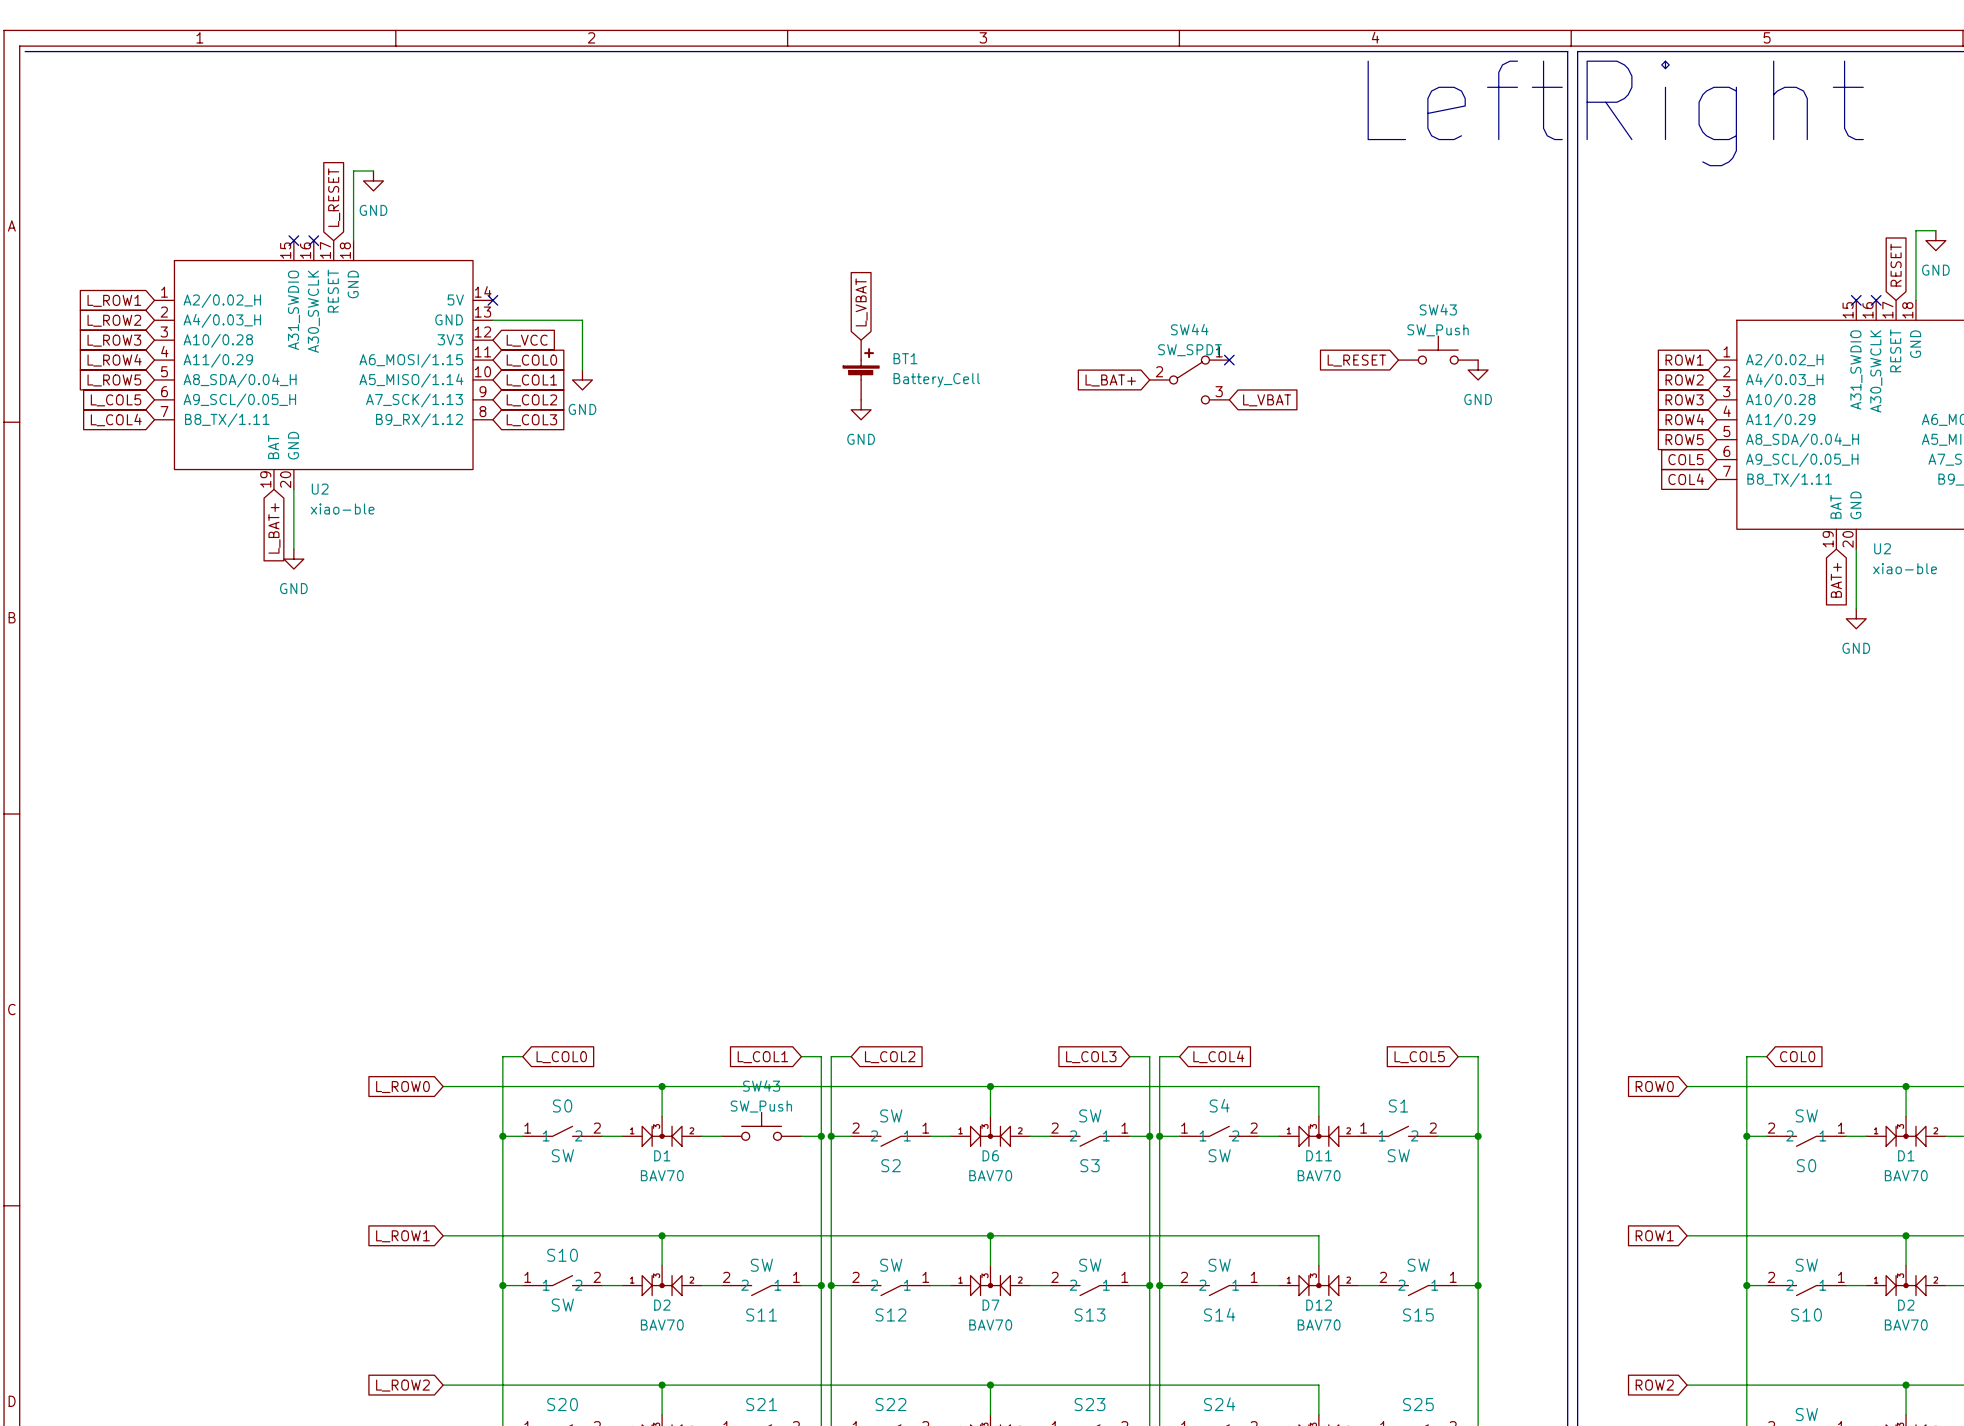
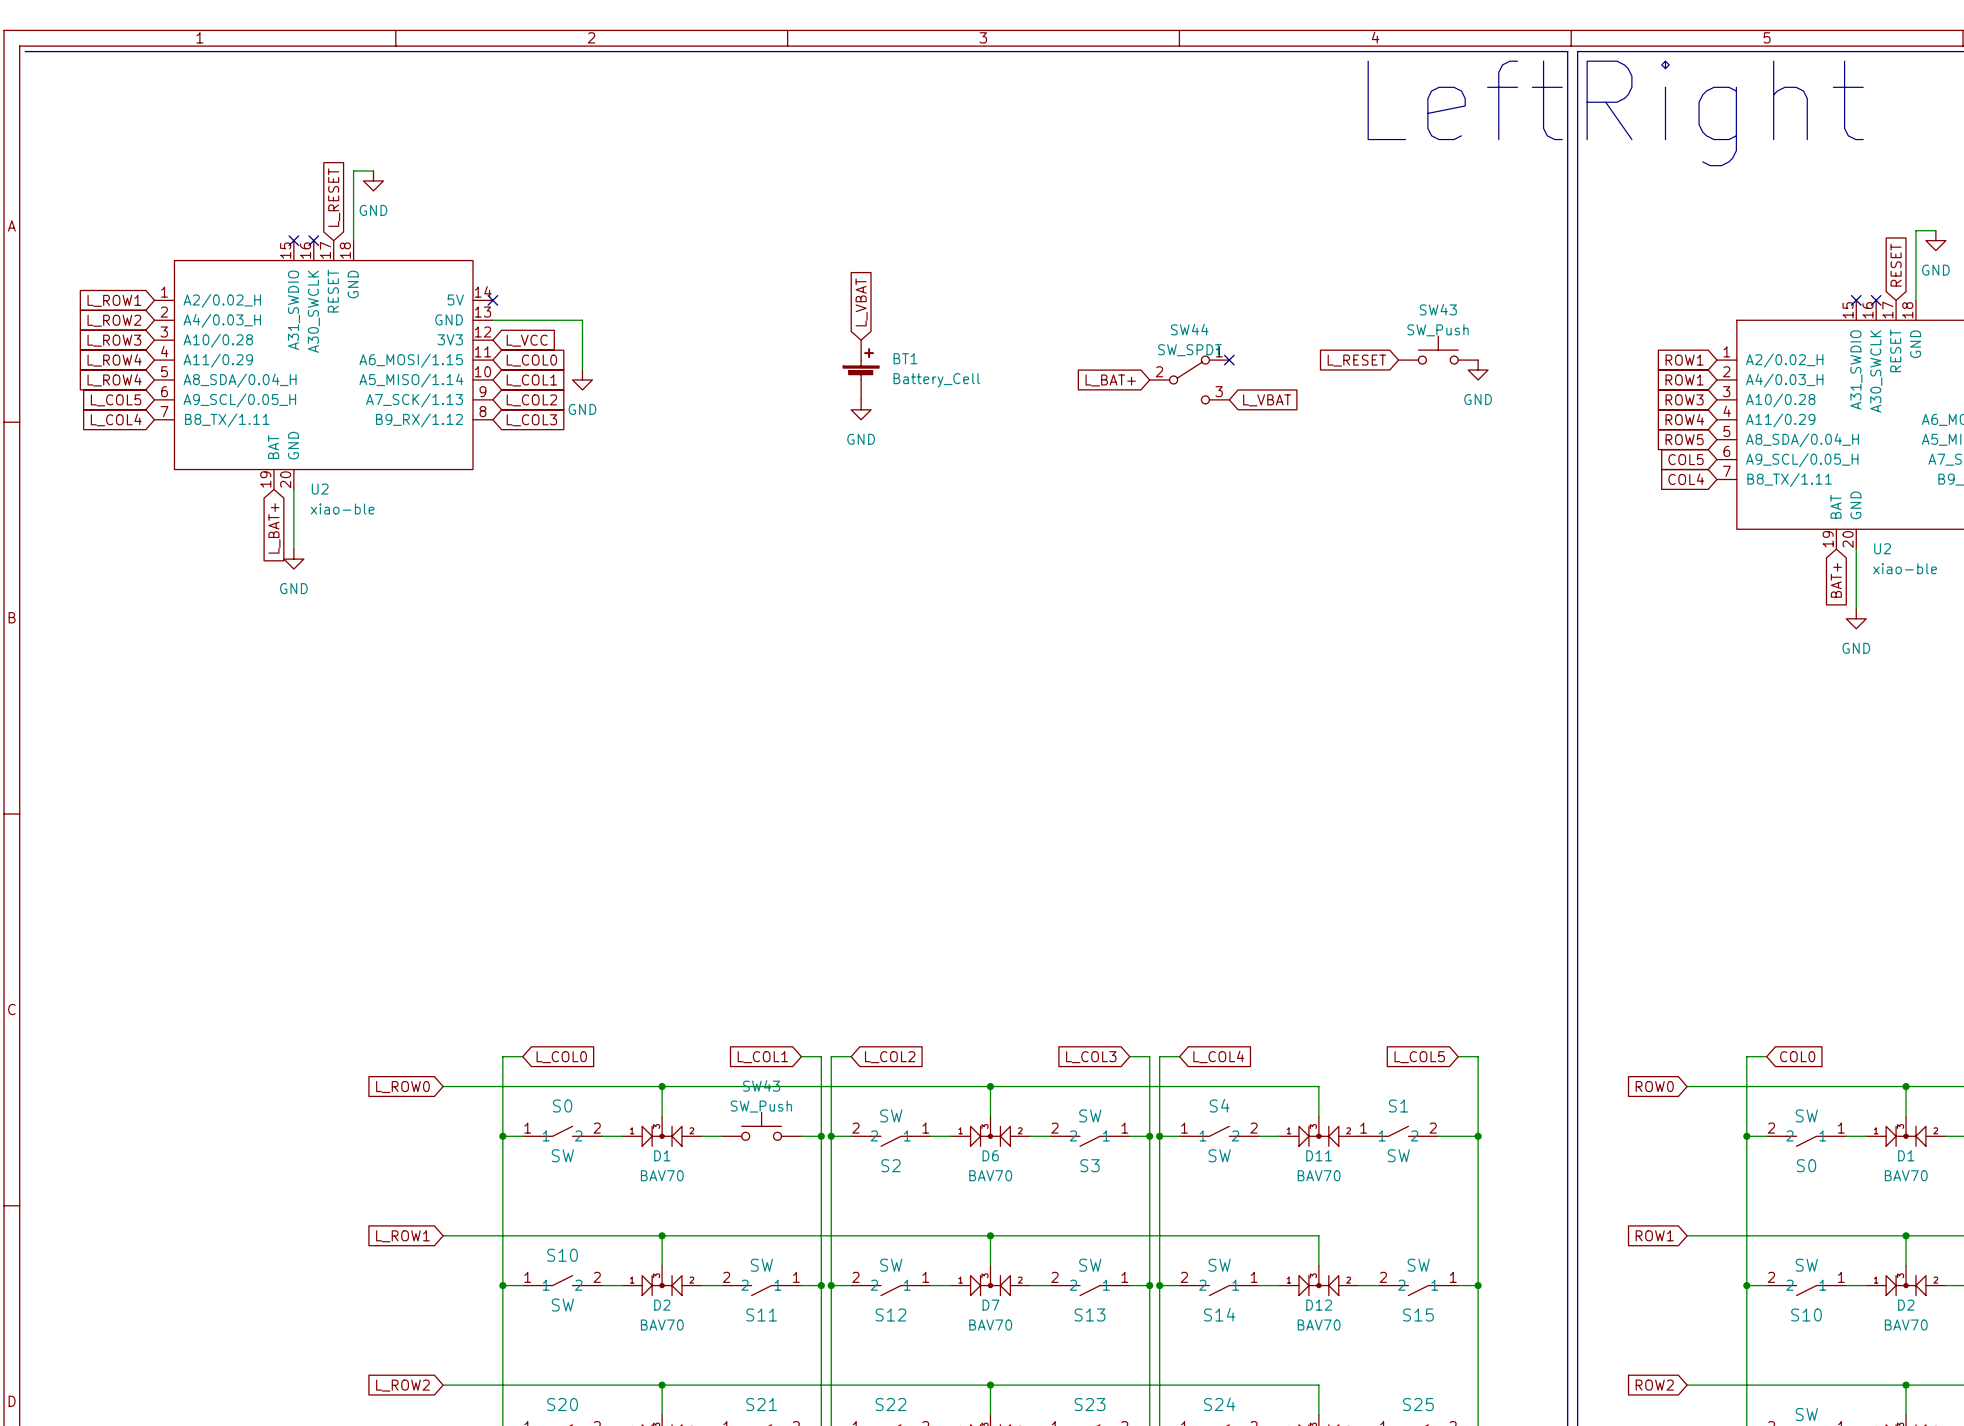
global label: ROW2 (1684, 379) -> ROW1 (1684, 379)
global label: L_ROW5 (114, 380) -> L_ROW4 (114, 380)

